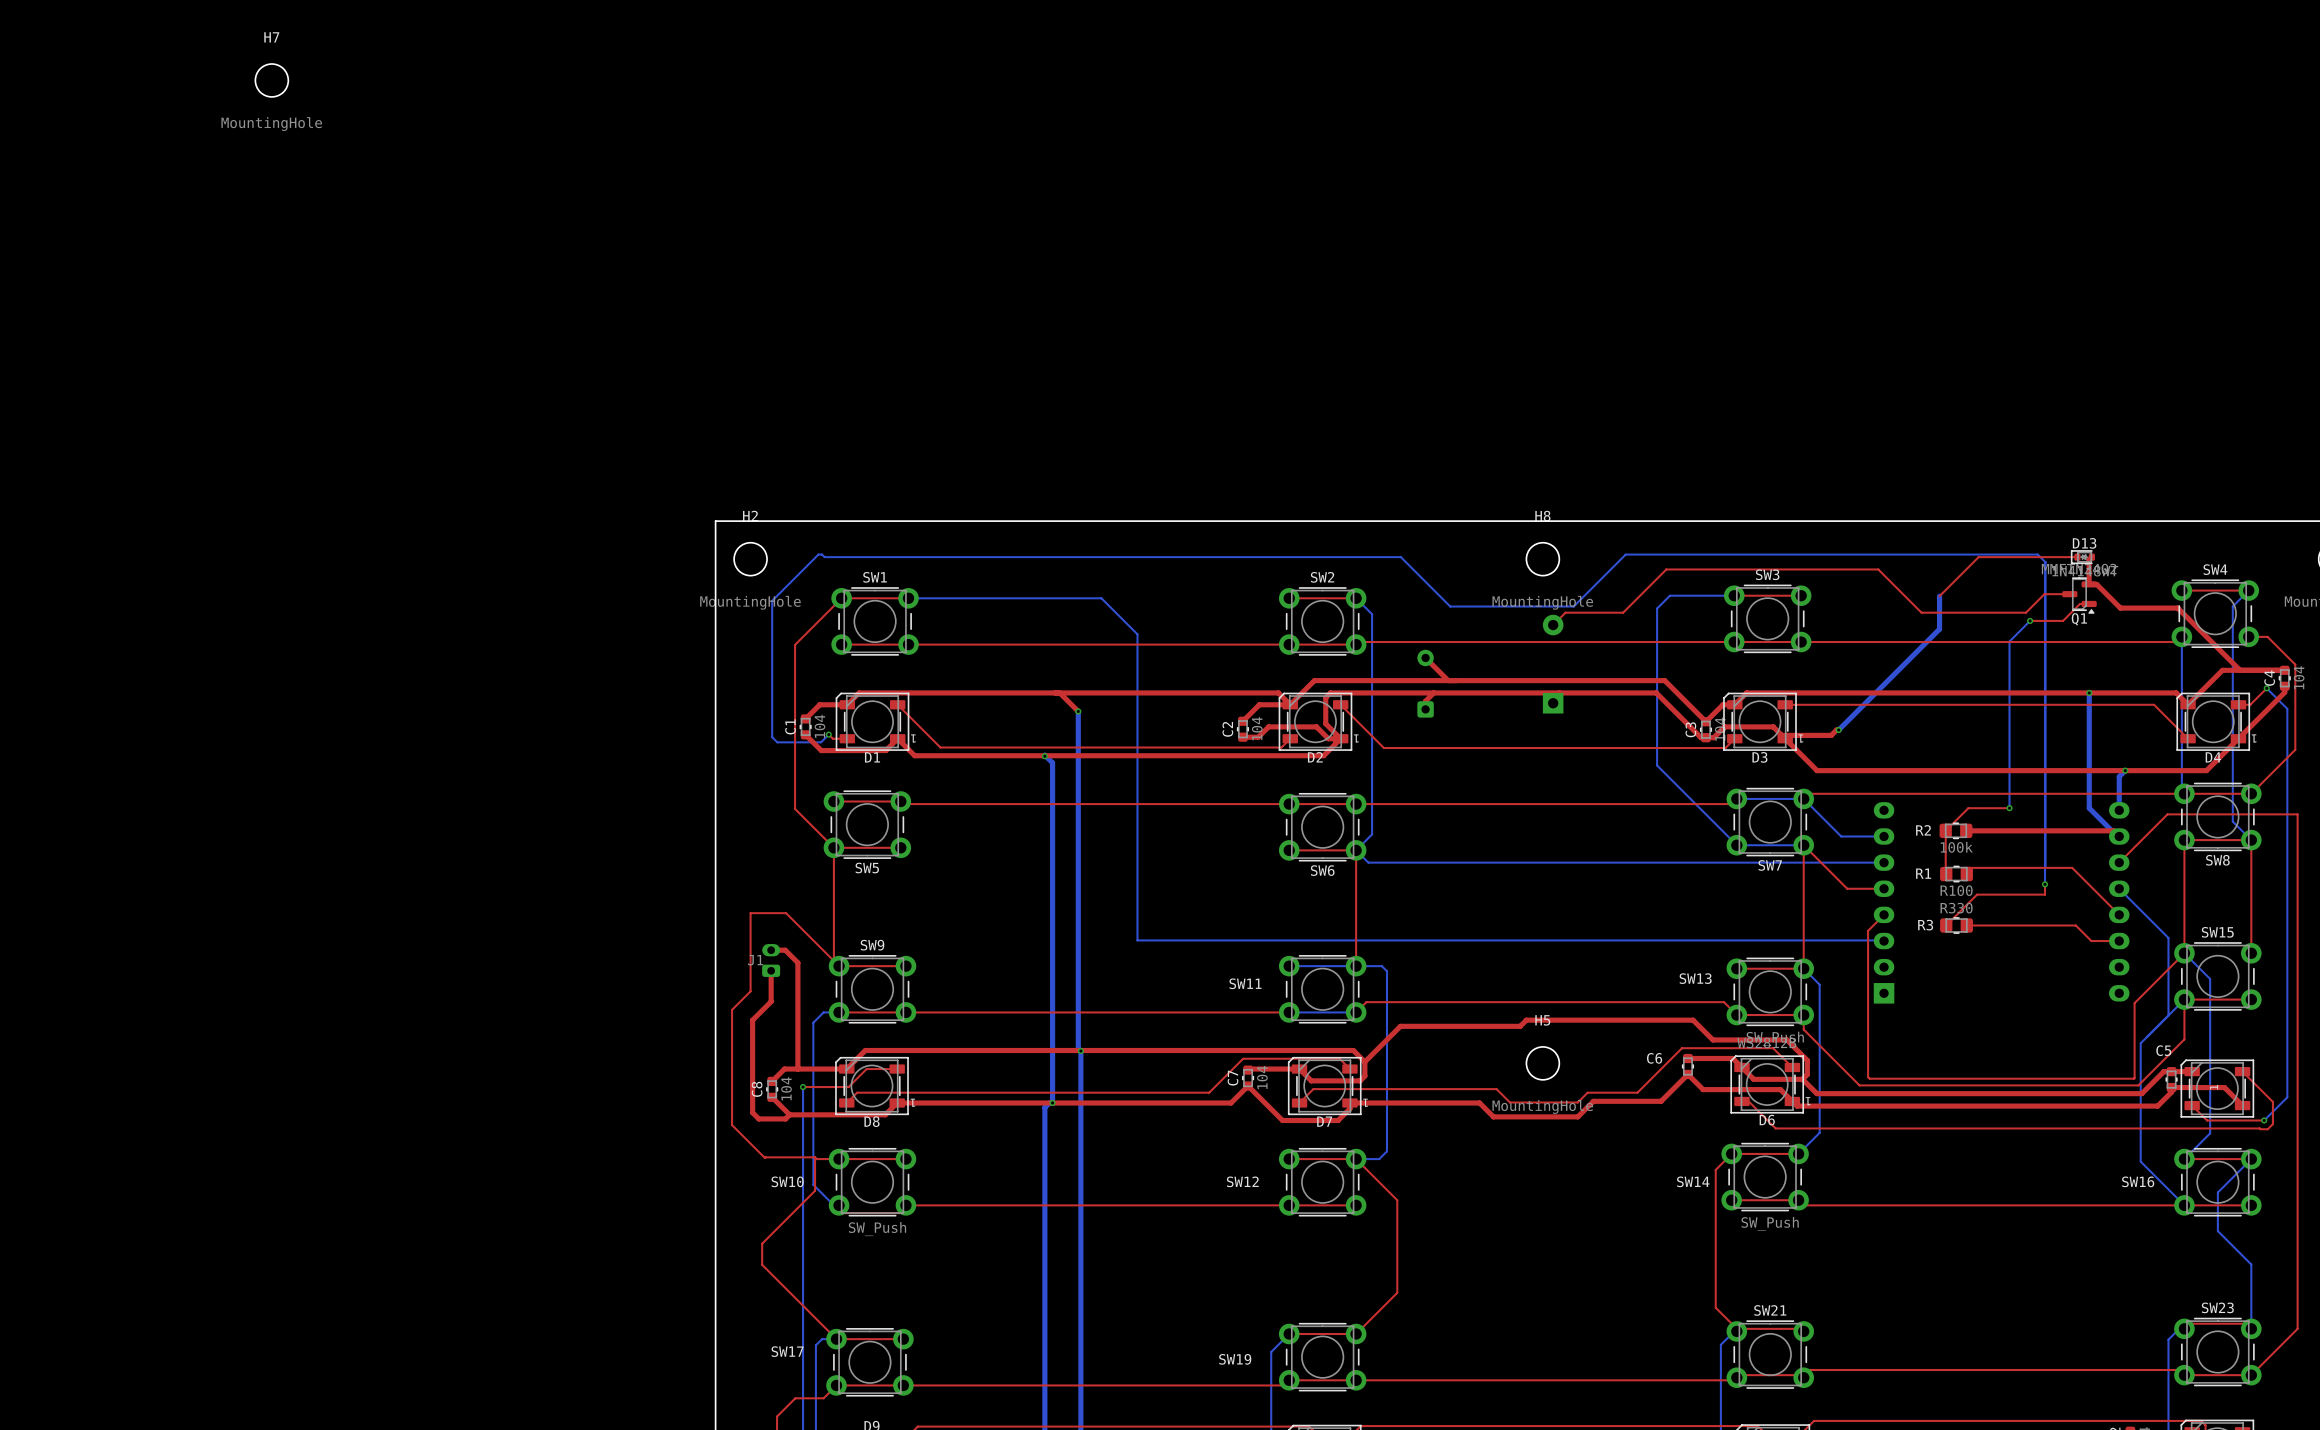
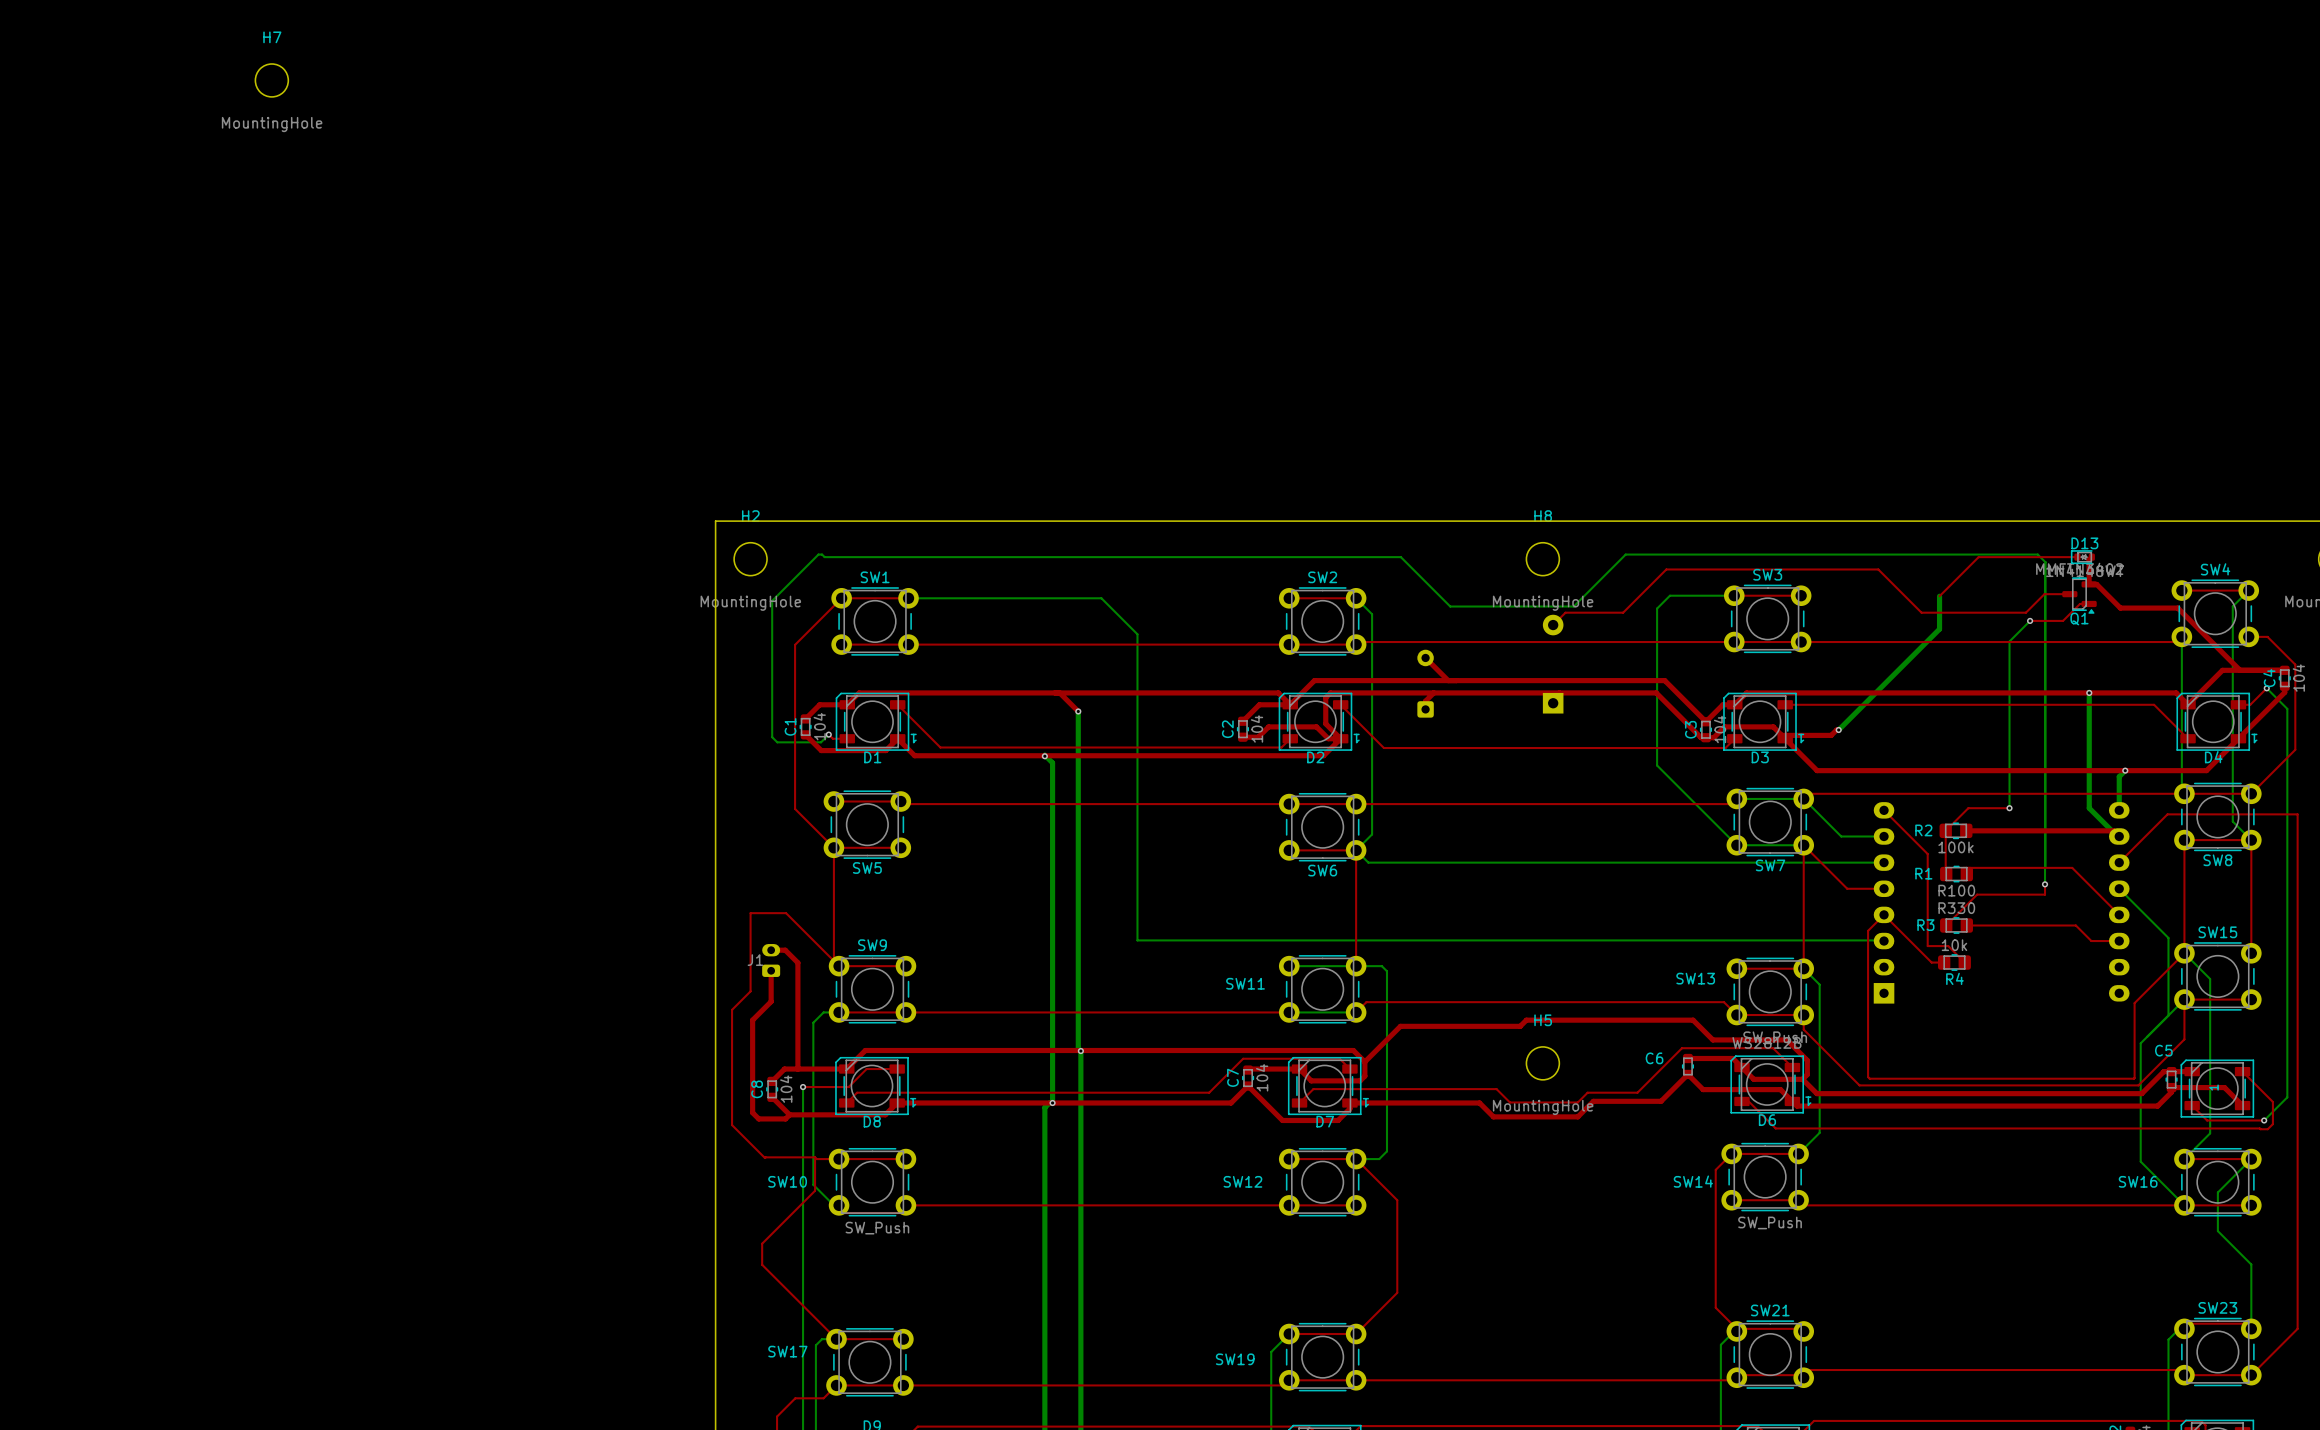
top track: none -> (1884, 810) (1927, 854) (1927, 946) (1948, 946) (1964, 962)
top track: none -> (1884, 914) (1931, 962) (1944, 962)
R4: none -> 10k (1954, 962)

